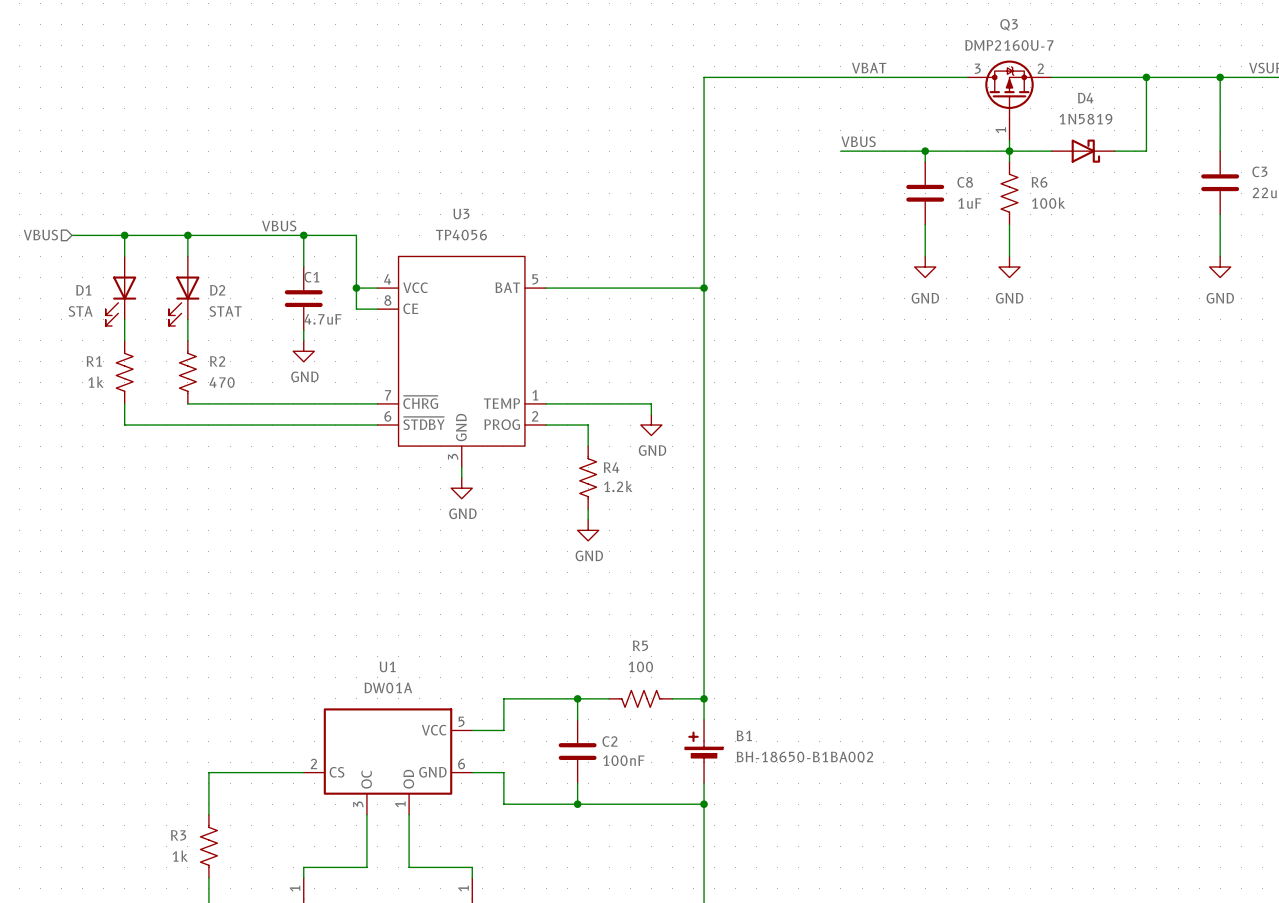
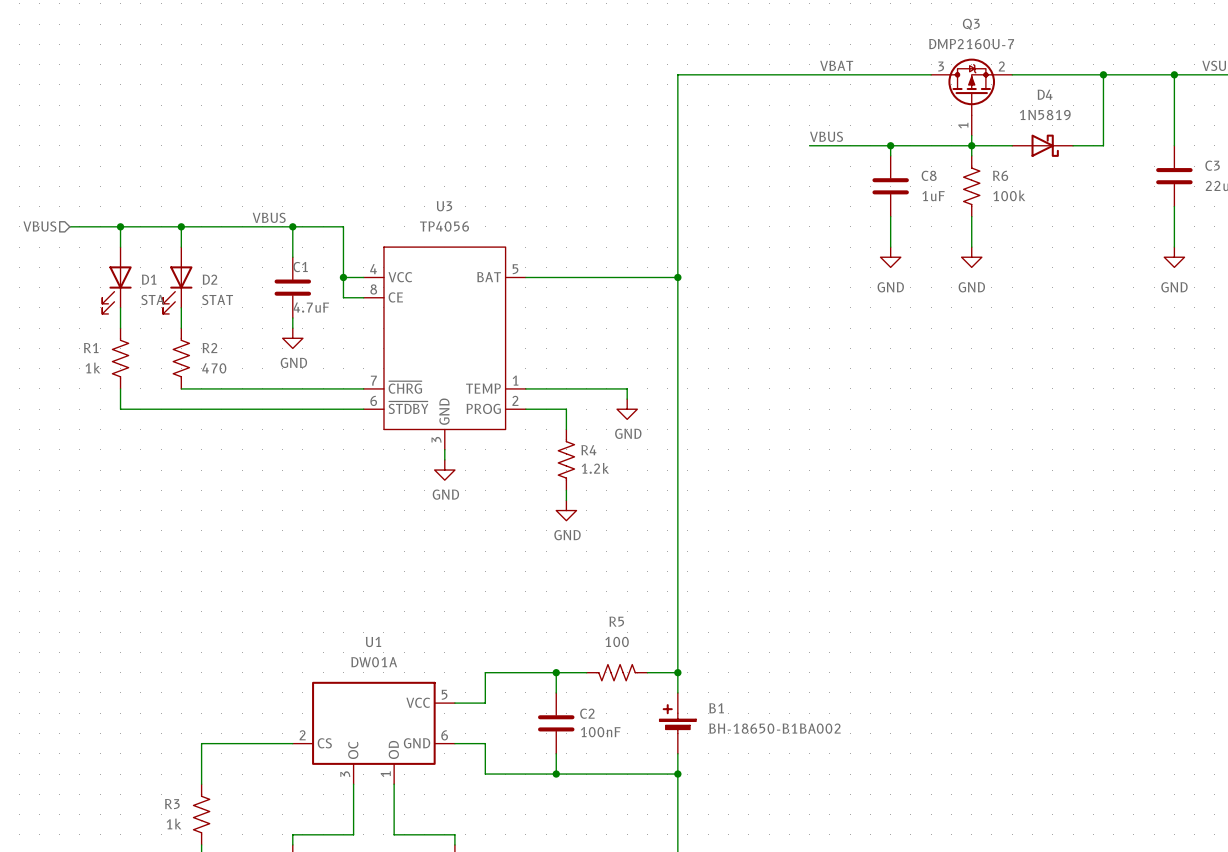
D1 name position: D1 (83, 290) -> D1 (149, 279)
D1 value position: STA (80, 311) -> STA (152, 299)

